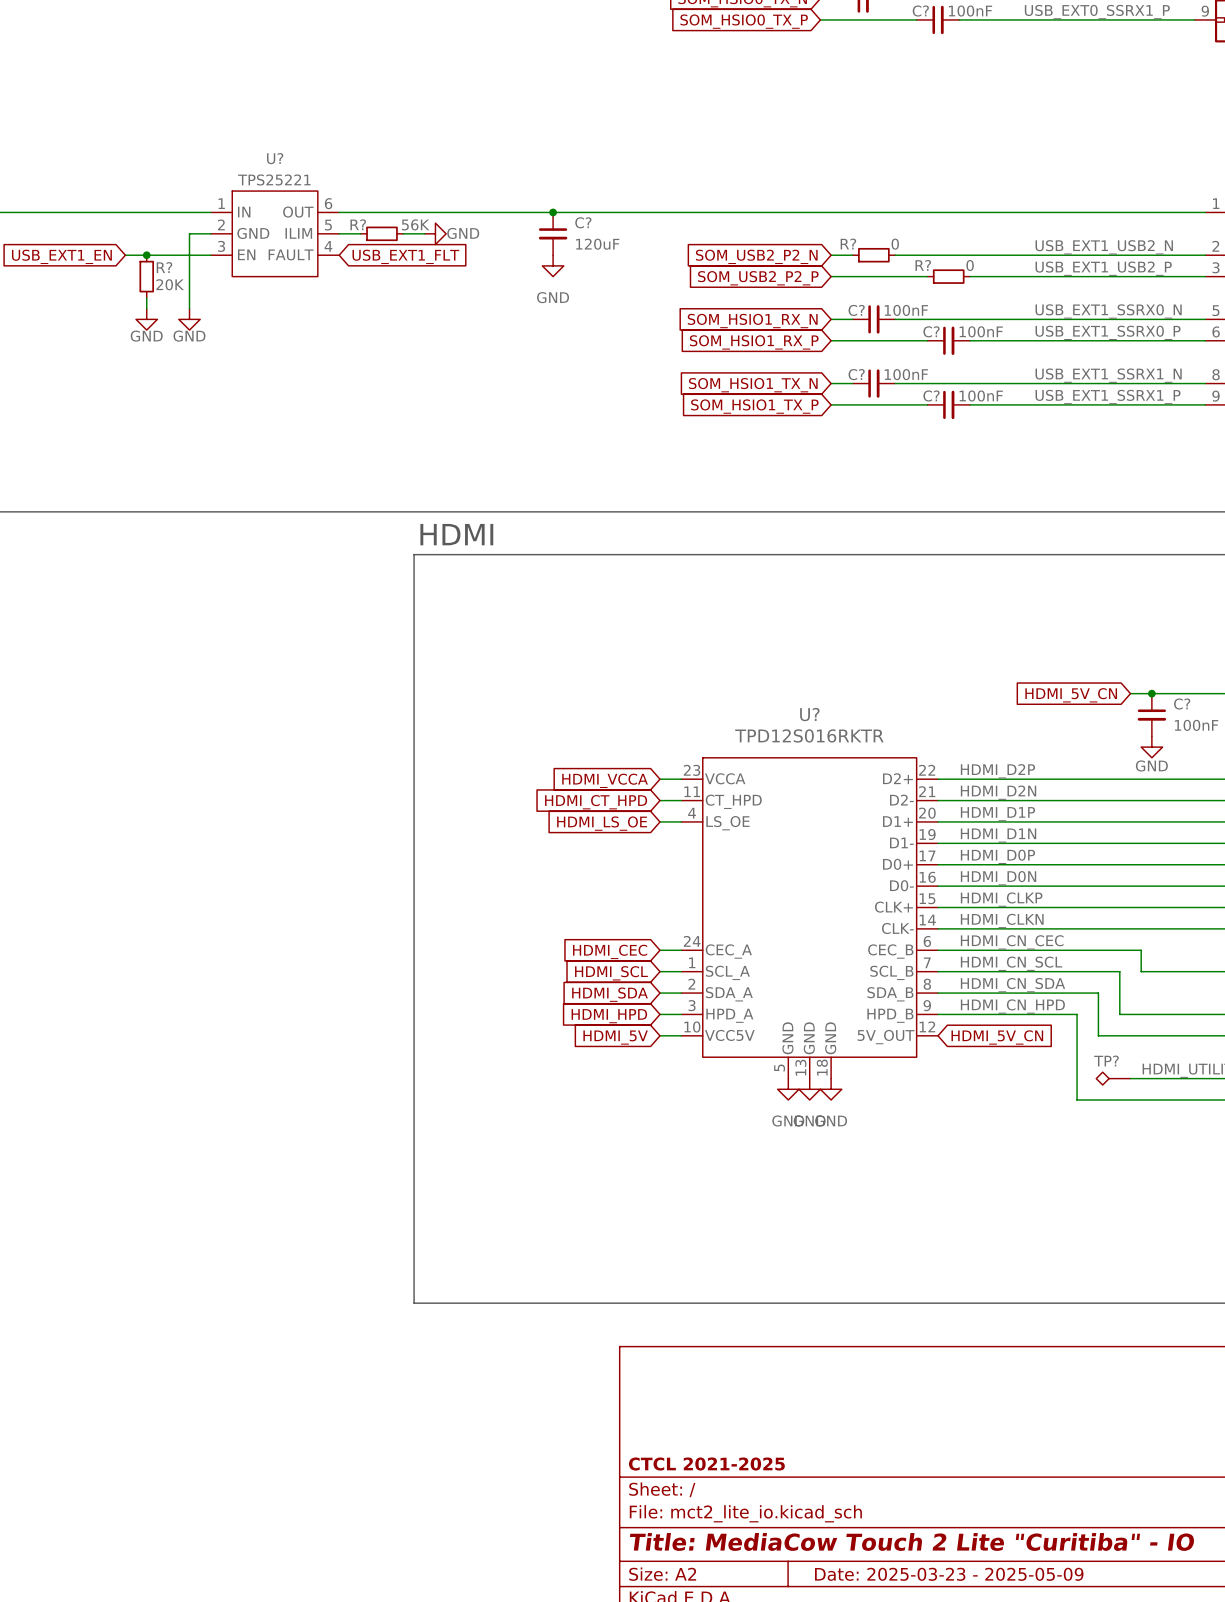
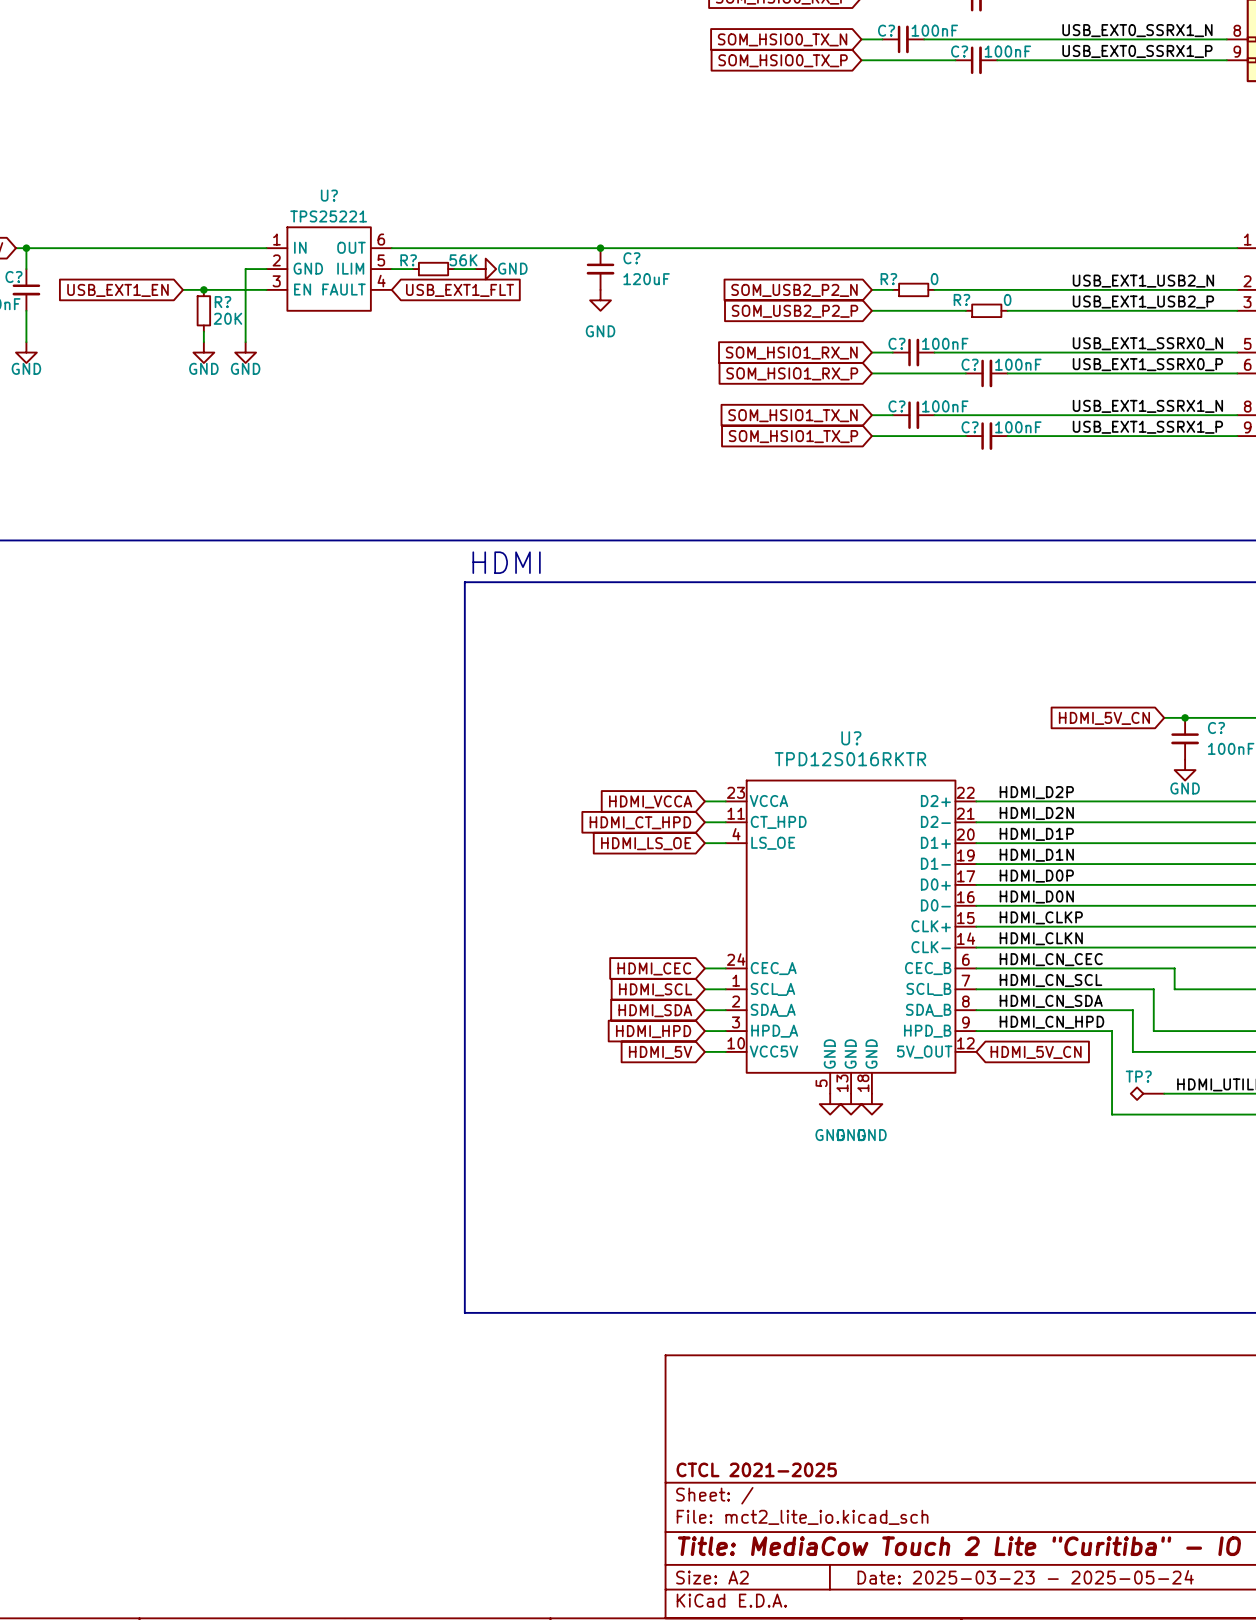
title block: Date: 2025-03-23 - 2025-05-09 (949, 1574) -> Date: 2025-03-23 - 2025-05-24 (1025, 1577)

